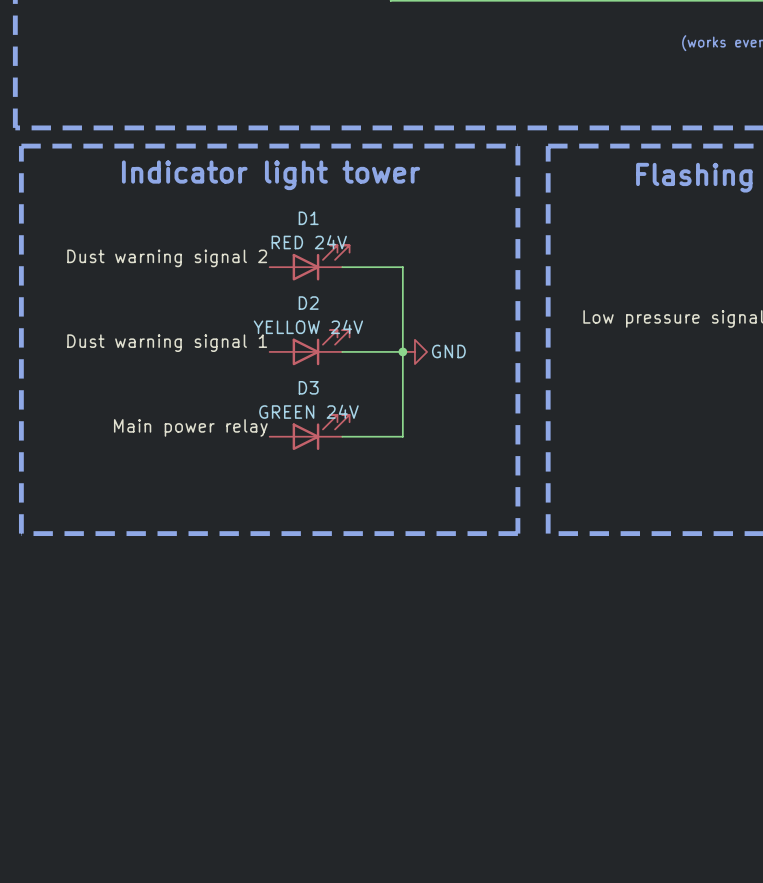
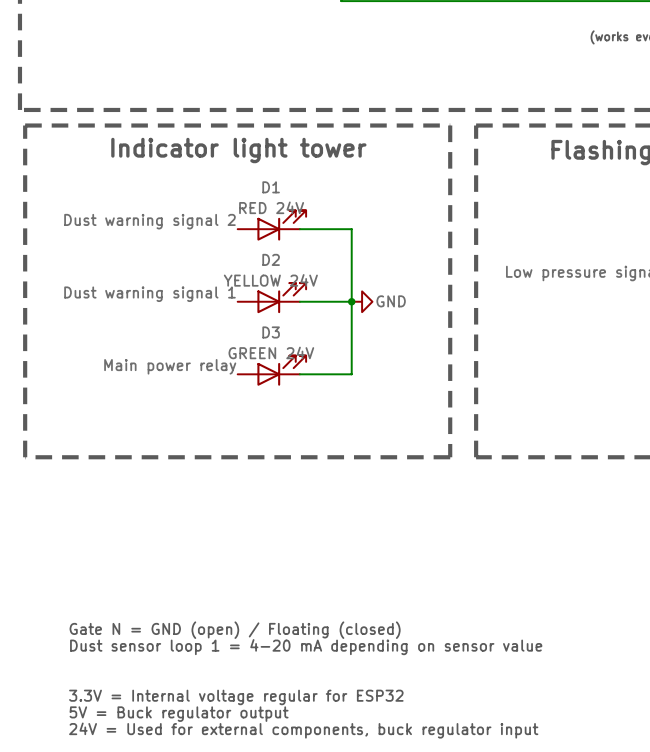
text: none -> Gate N = GND (open) / Floating (closed) (235, 630)
text: none -> Dust sensor loop 1 = 4-20 mA depending on sensor value (306, 647)
text: none -> 3.3V = Internal voltage regular for ESP32 (236, 697)
text: none -> 5V = Buck regulator output (179, 714)
text: none -> 24V = Used for external components, buck regulator input (303, 730)

